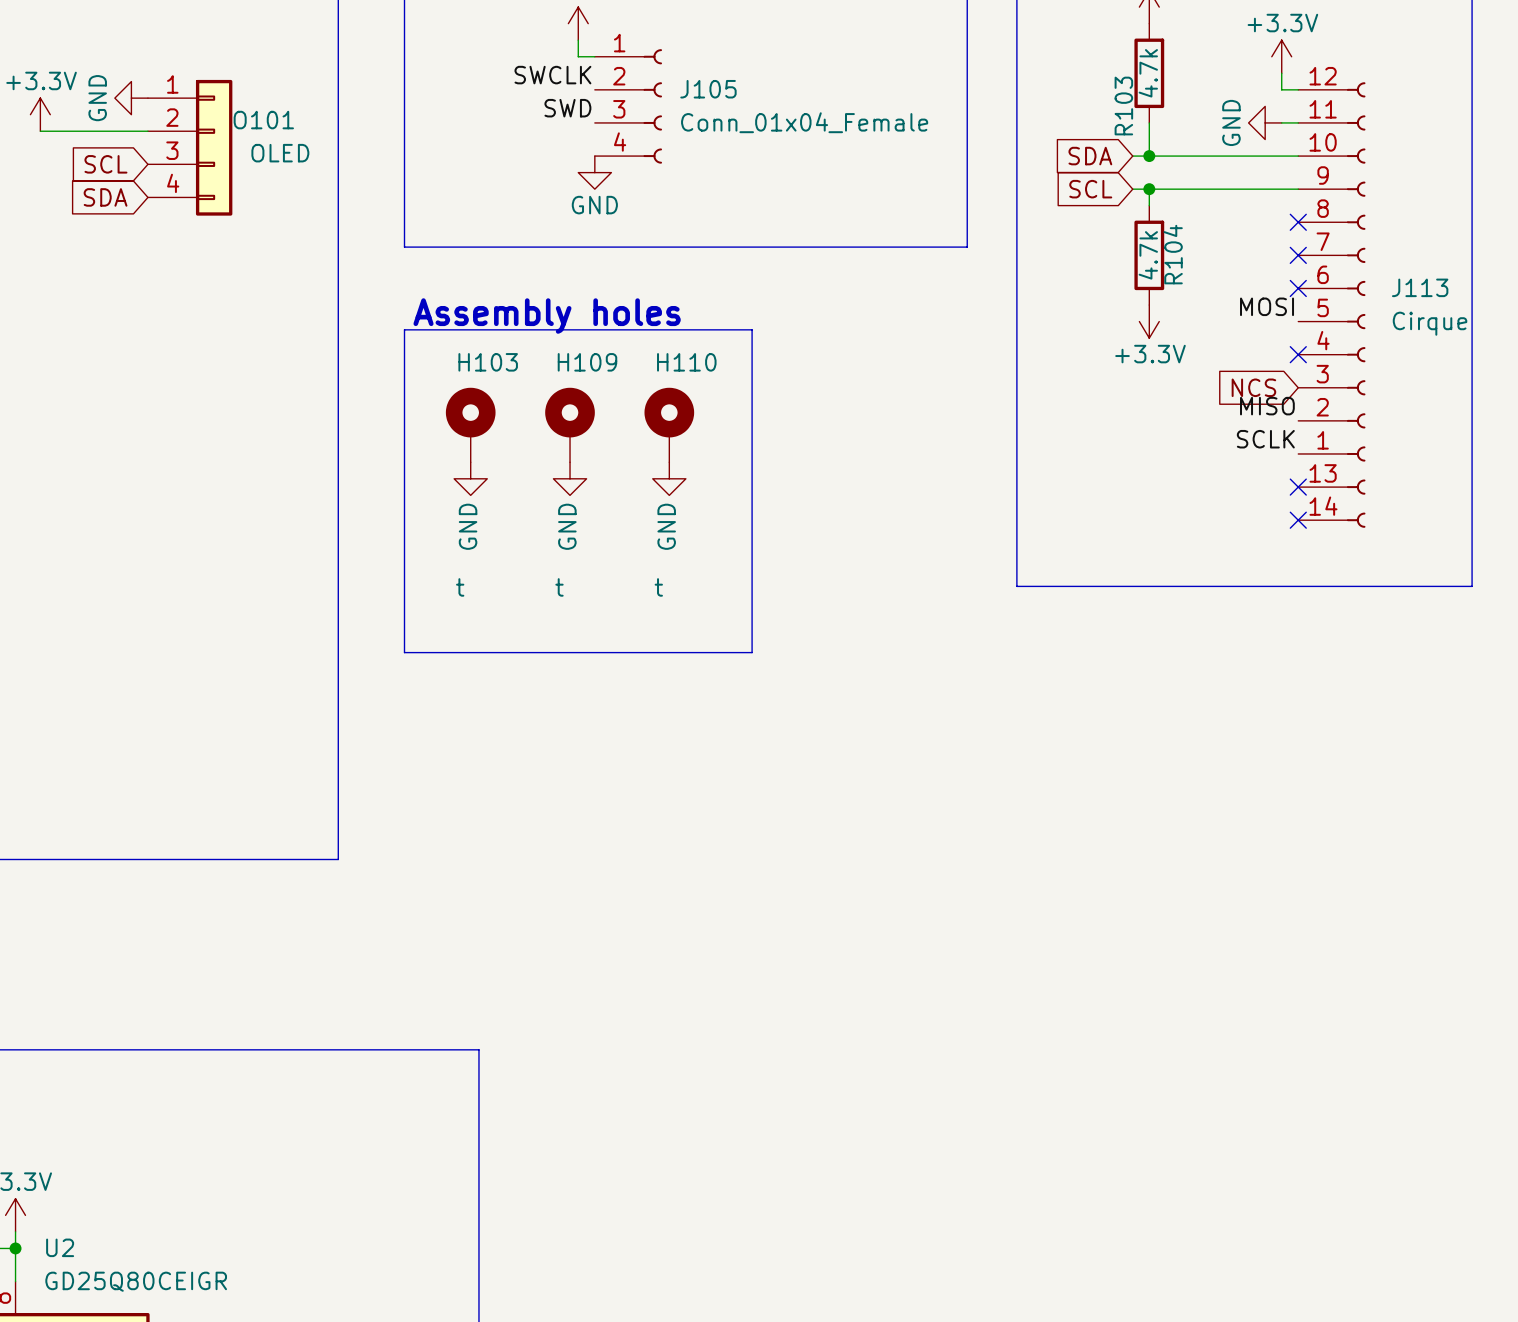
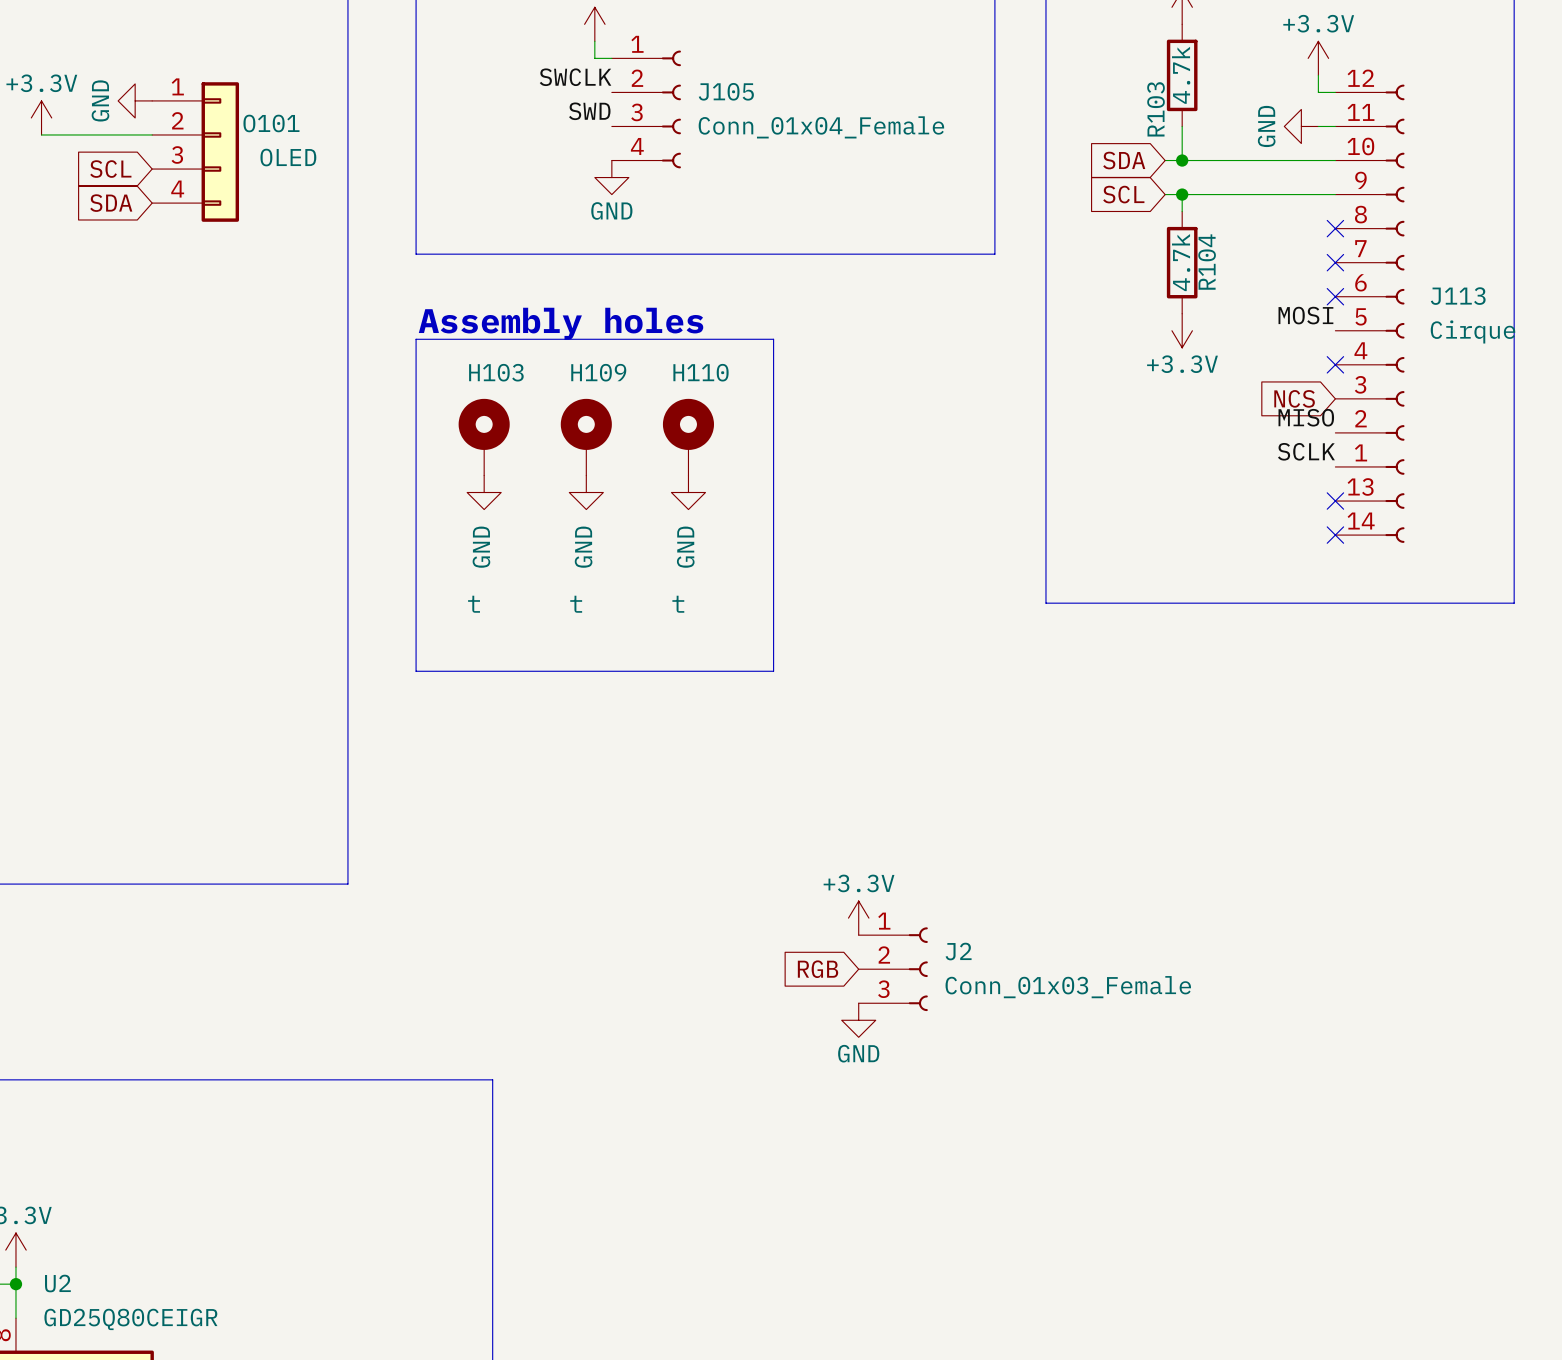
power symbol: none -> +3.3V (858, 918)
global label: none -> RGB (818, 969)
J2: none -> Conn_01x03_Female (893, 969)
power symbol: none -> GND (858, 1020)

